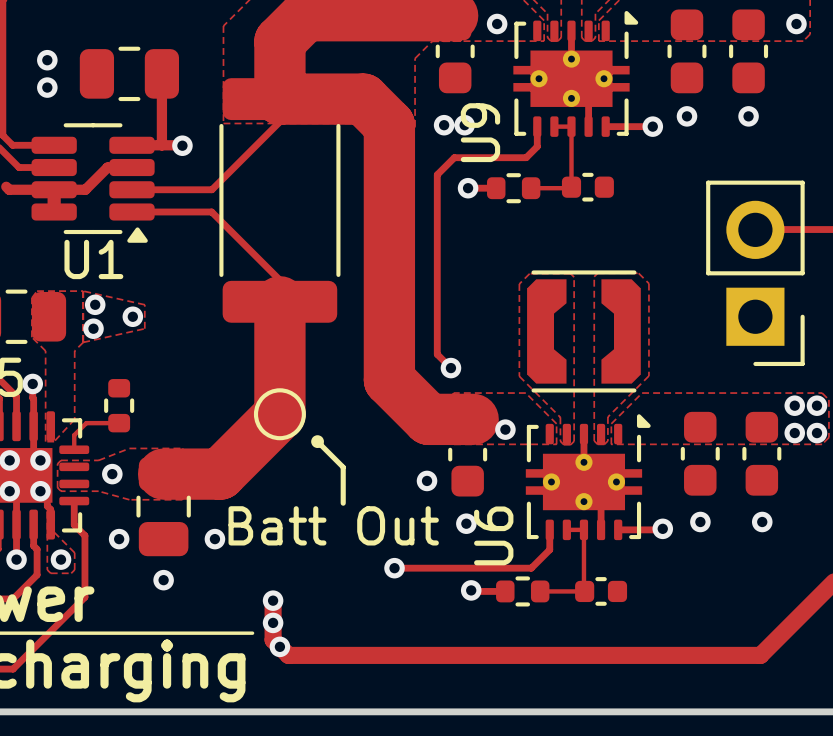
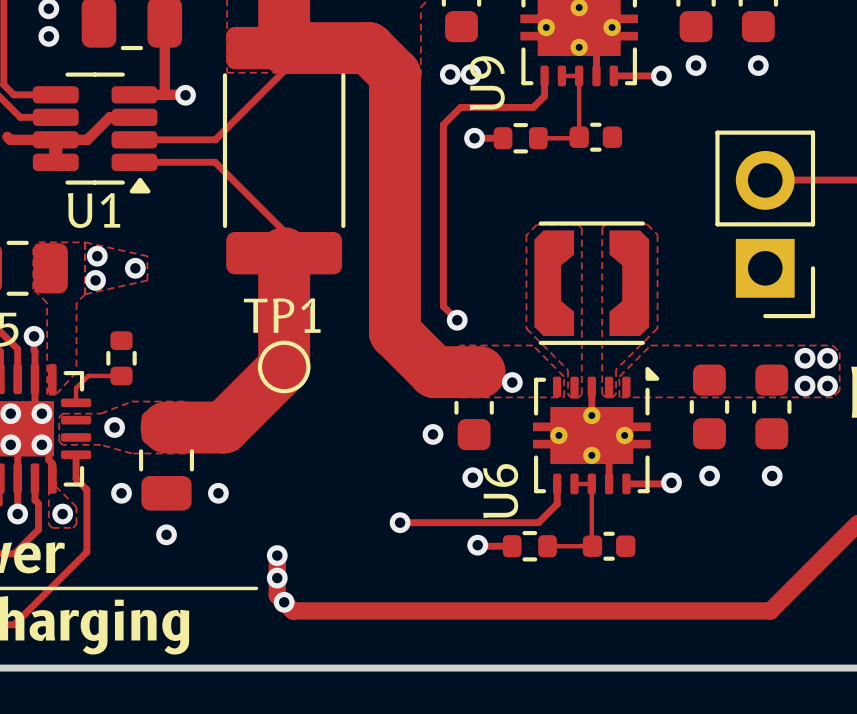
TP1 name: none -> TP1 (282, 315)
drawing: [311, 435, 324, 449] -> none
line: (317, 441) (343, 467) (343, 503) -> none
TP1 value: Batt Out (333, 525) -> none

